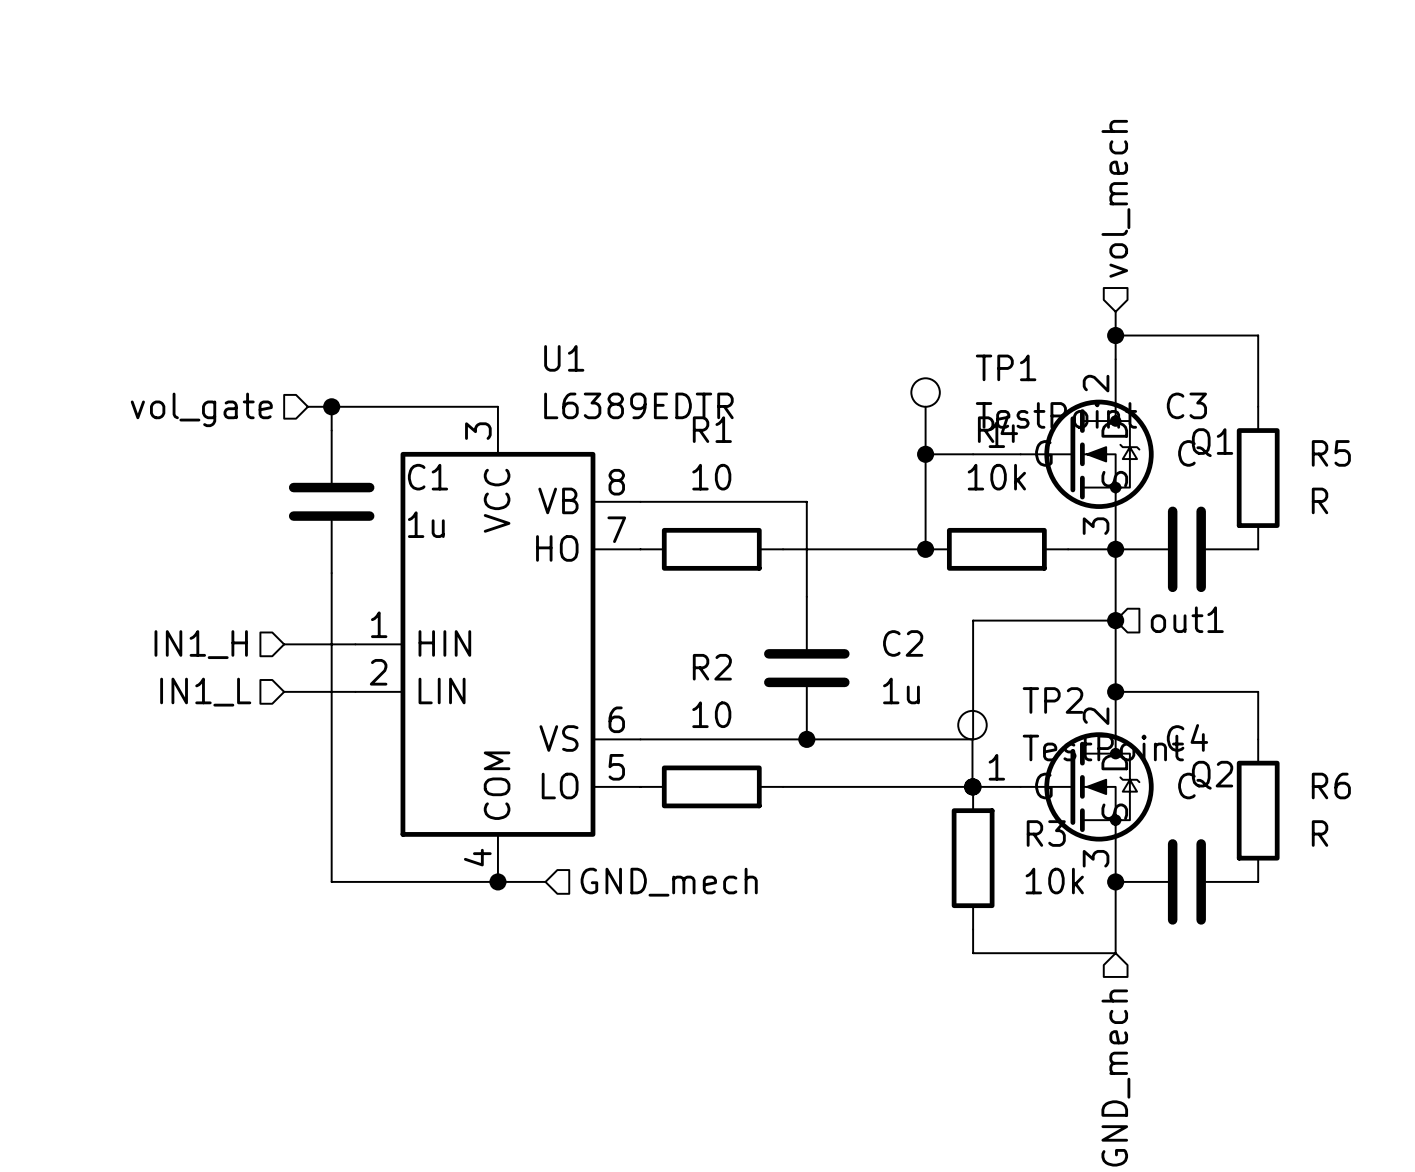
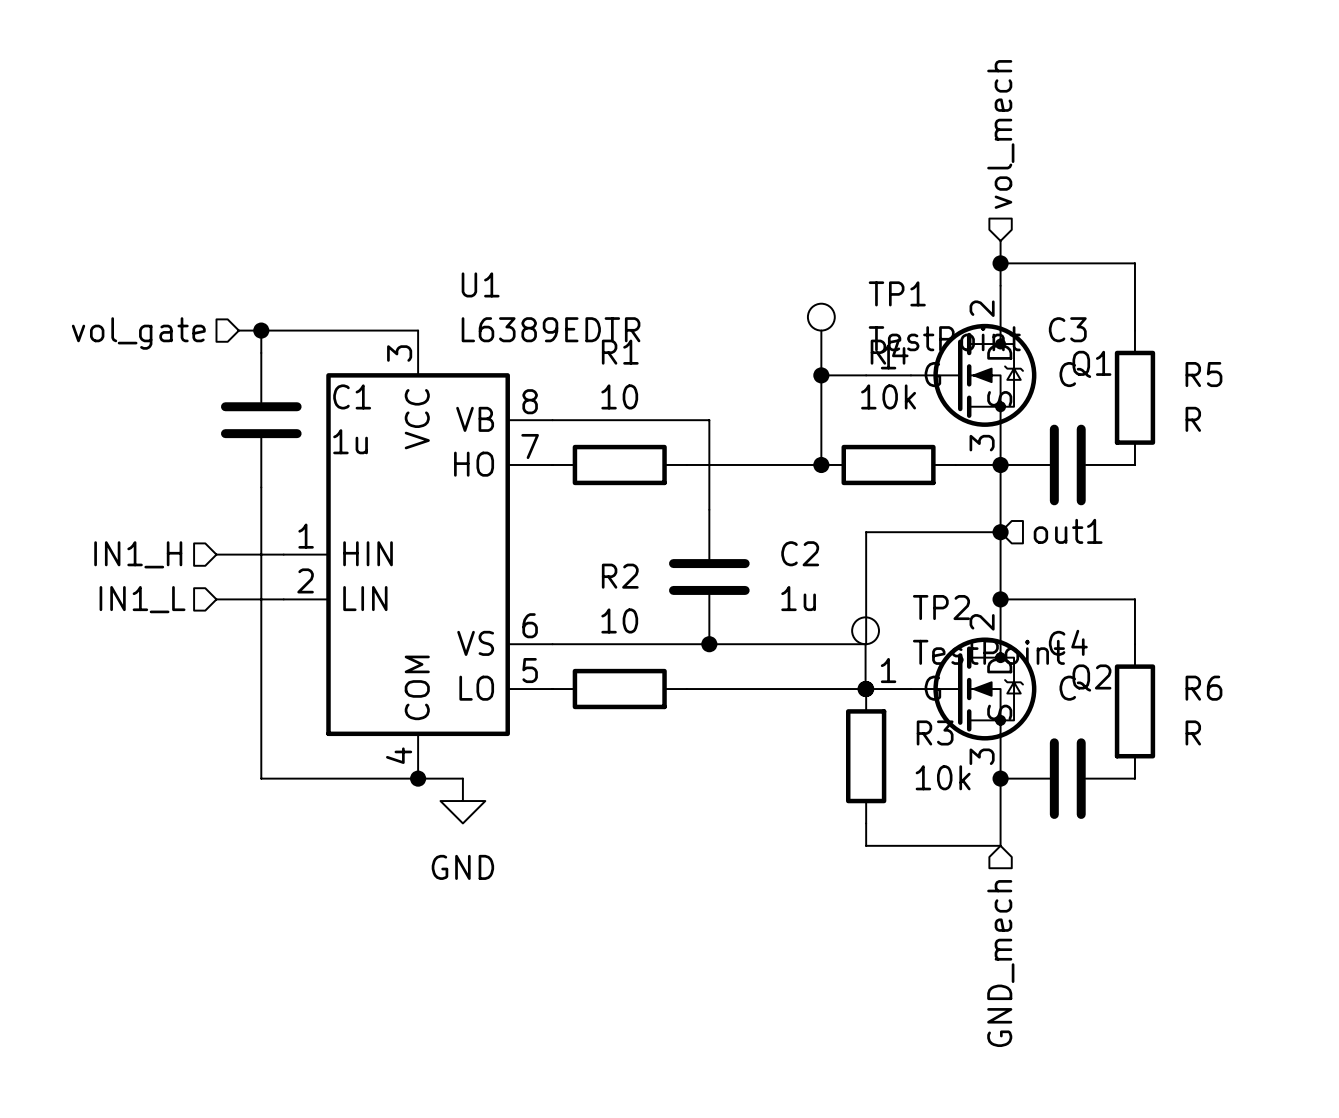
hierarchical label: GND_mech (669, 882) -> none
power symbol: none -> GND (462, 801)

